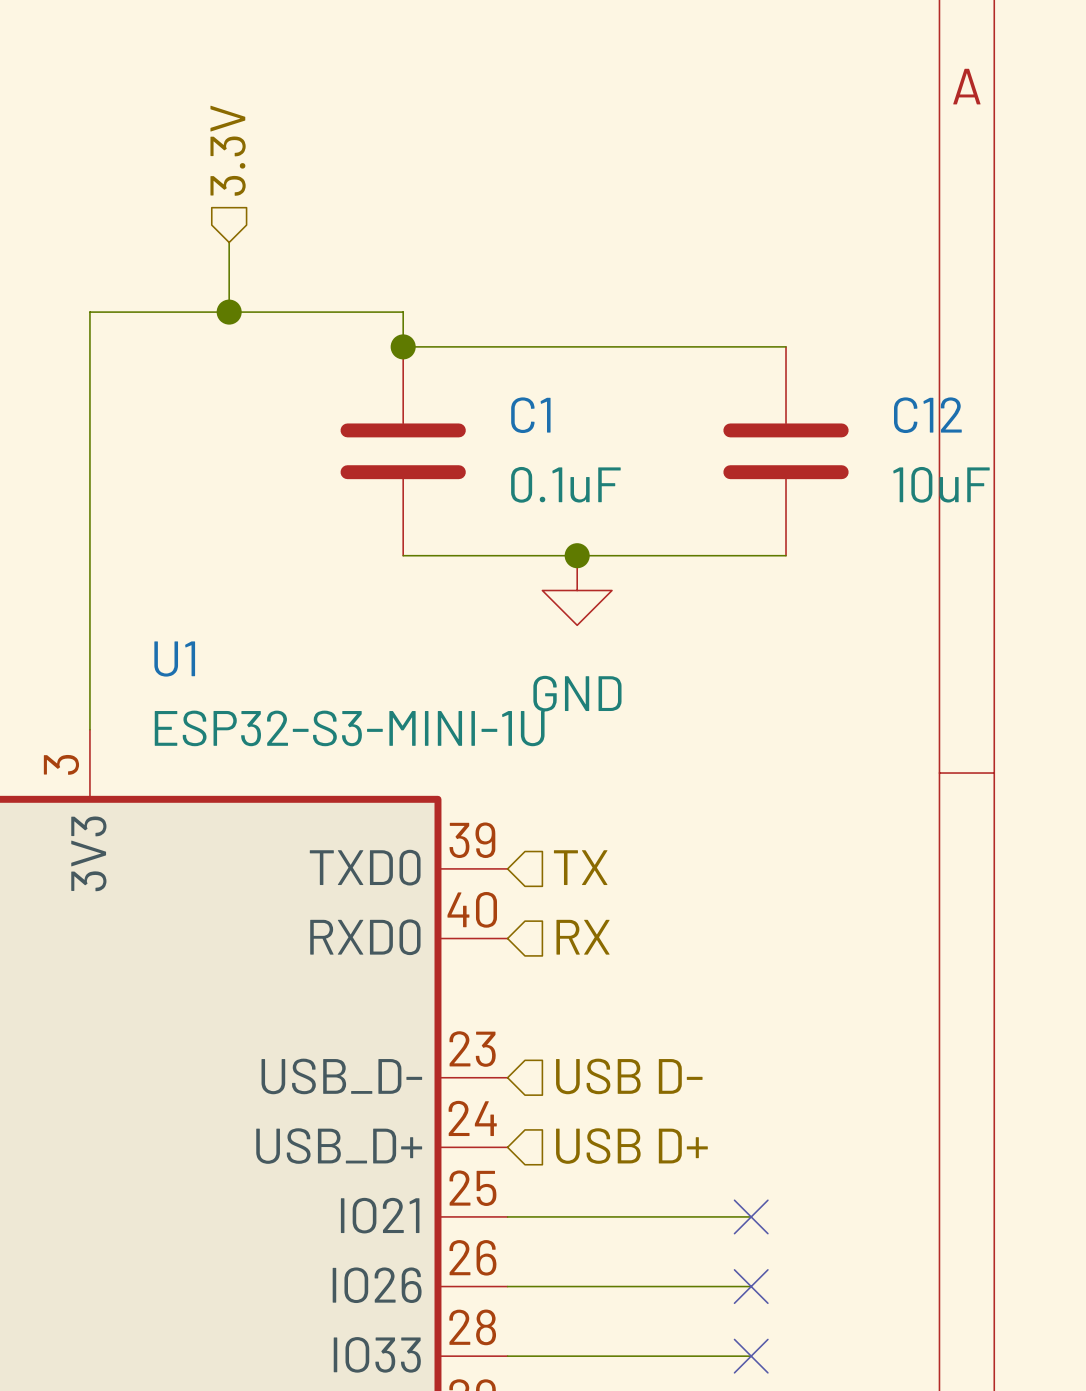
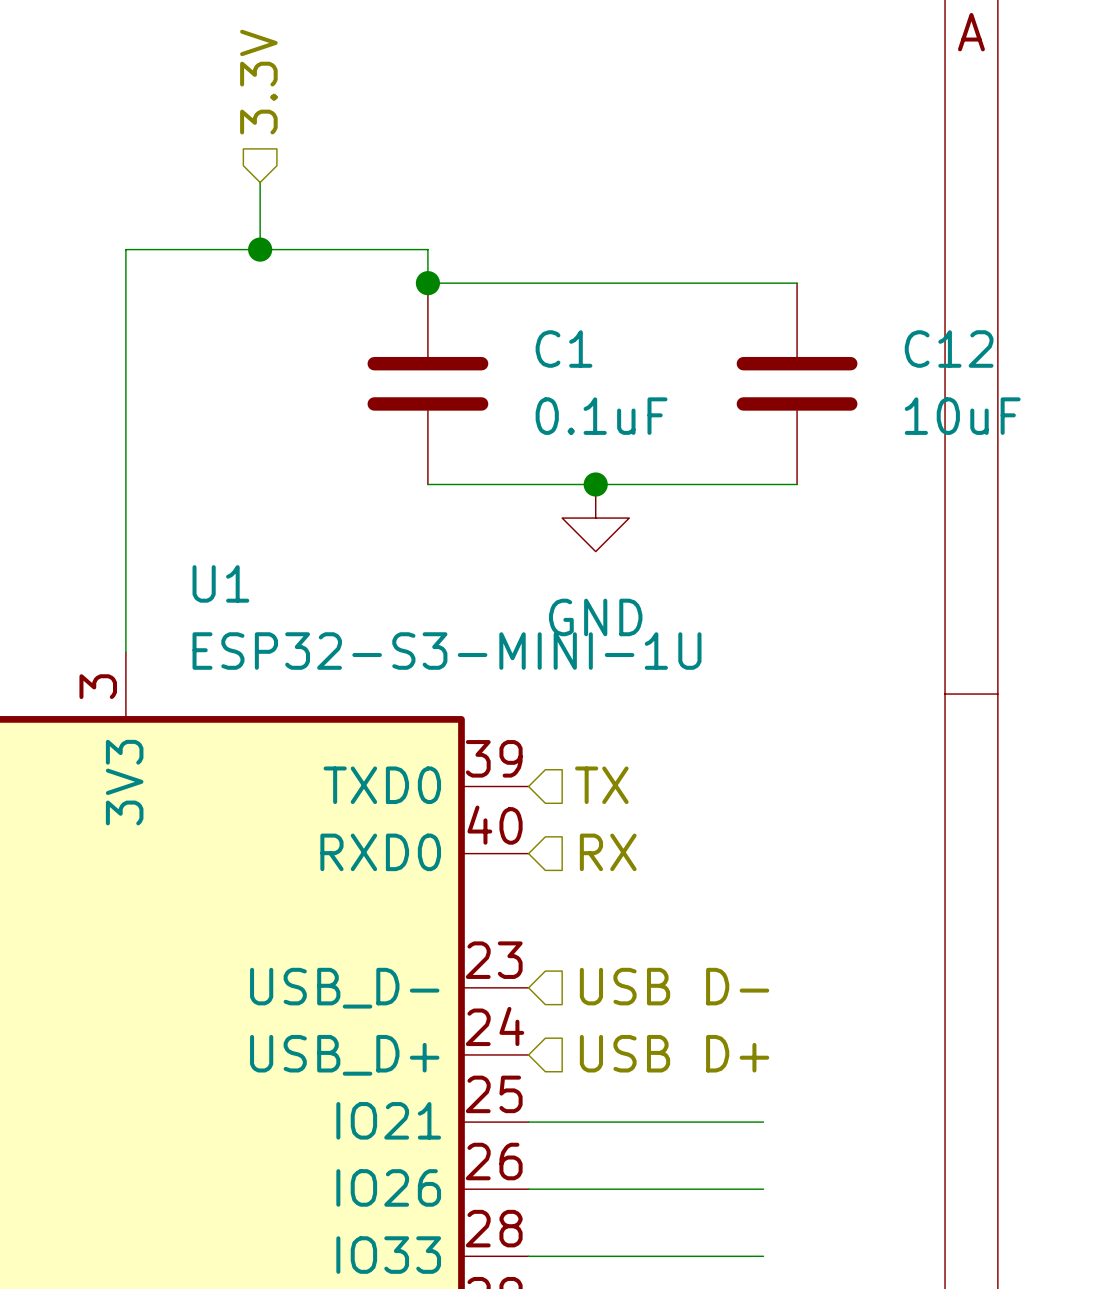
no-connect mark: (751, 1216) -> none
no-connect mark: (751, 1286) -> none
no-connect mark: (751, 1356) -> none

